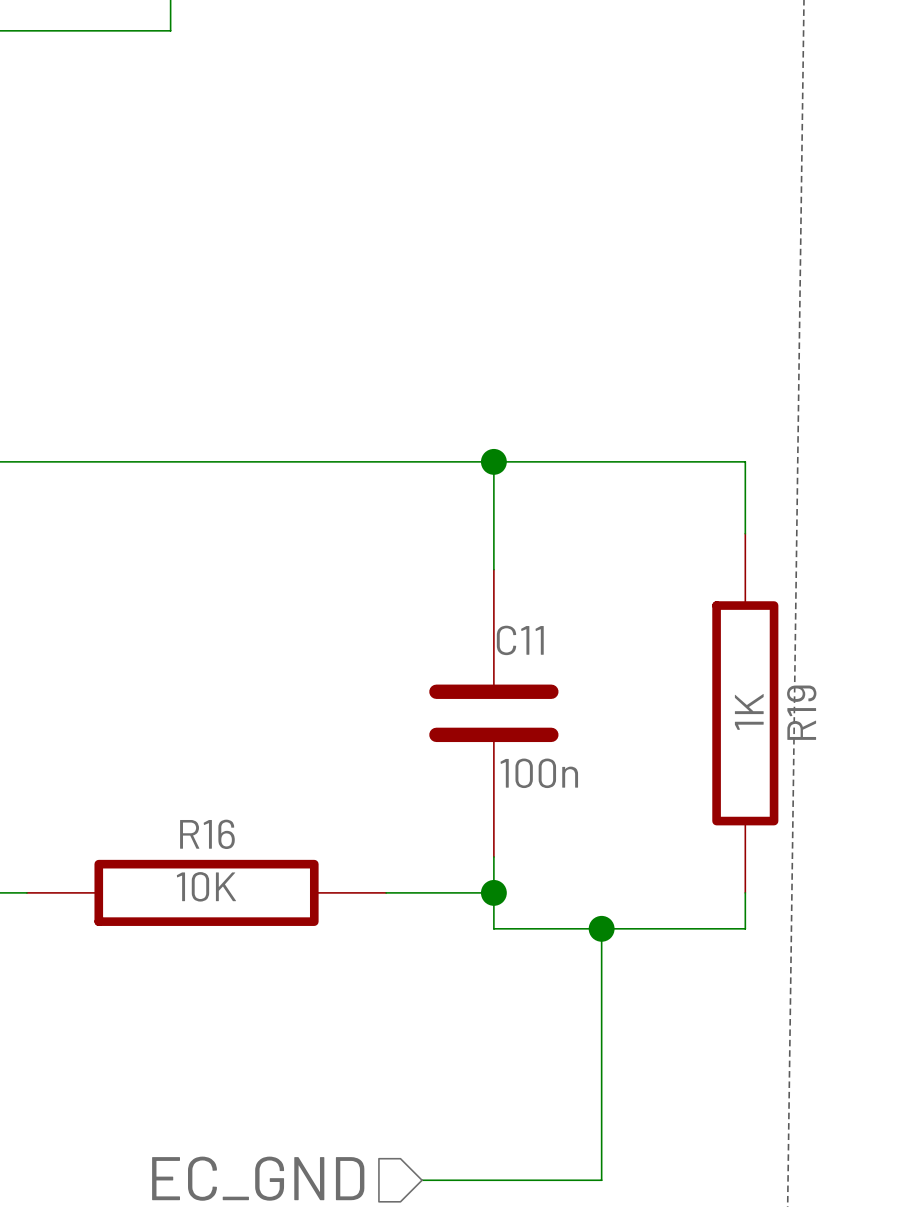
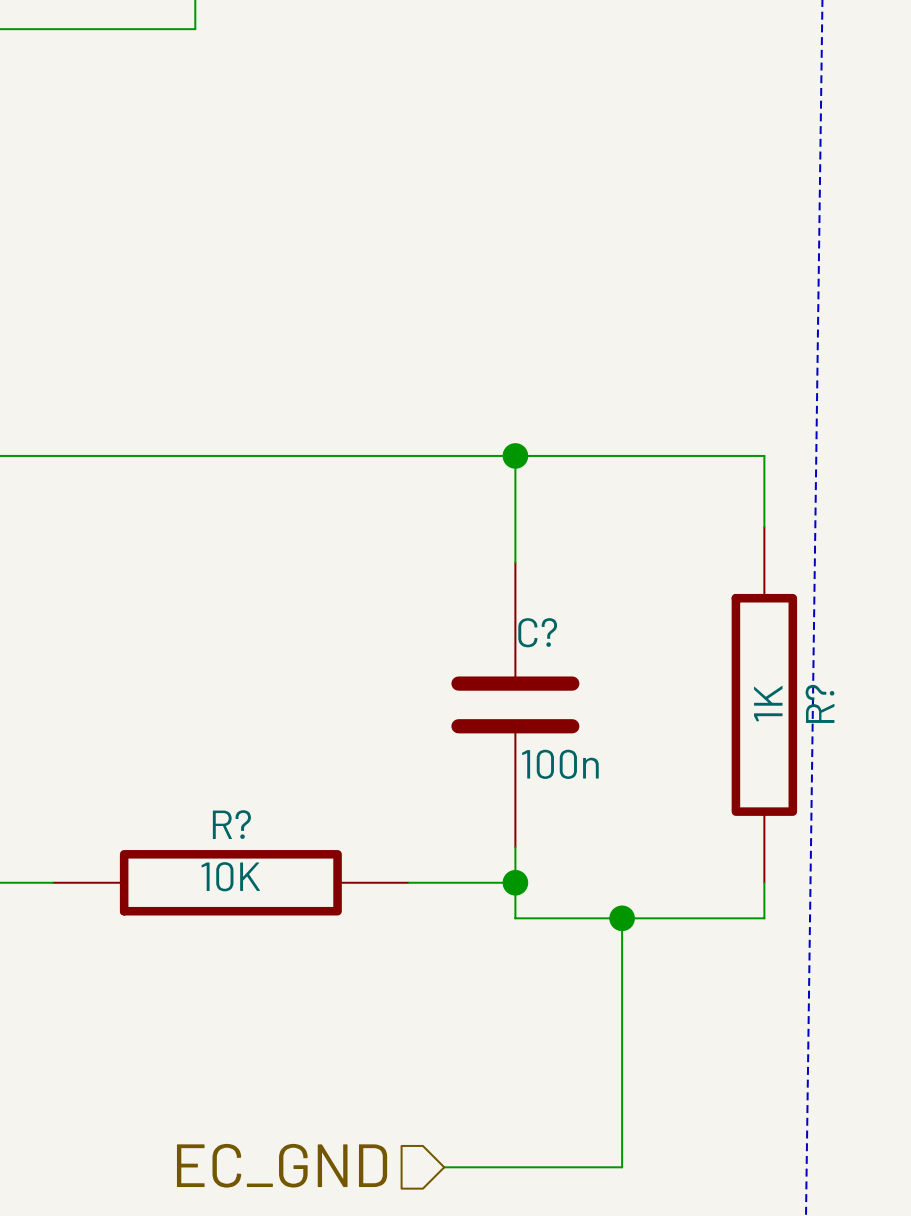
C11 name: C11 (520, 640) -> C? (537, 632)
R19 name: R19 (801, 712) -> R? (820, 703)
R16 name: R16 (207, 834) -> R? (231, 824)

